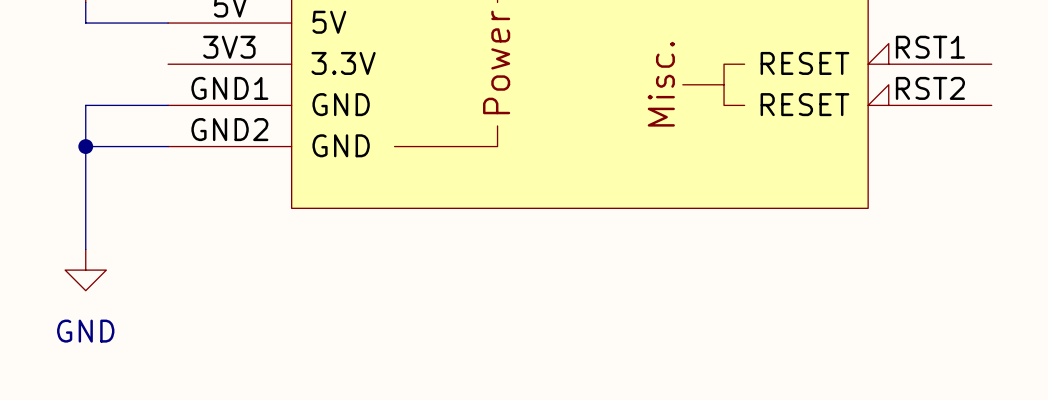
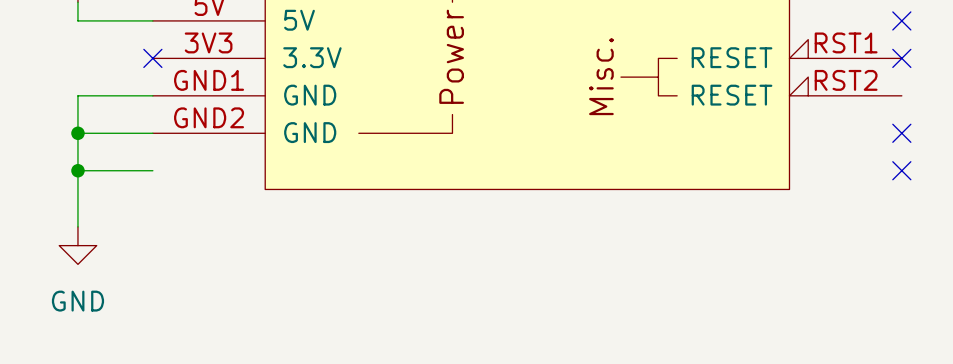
no-connect mark: none -> (901, 20)
no-connect mark: none -> (152, 58)
no-connect mark: none -> (901, 58)
no-connect mark: none -> (901, 133)
wire: none -> (77, 170) (152, 170)
junction: none -> (77, 170)
no-connect mark: none -> (901, 170)

